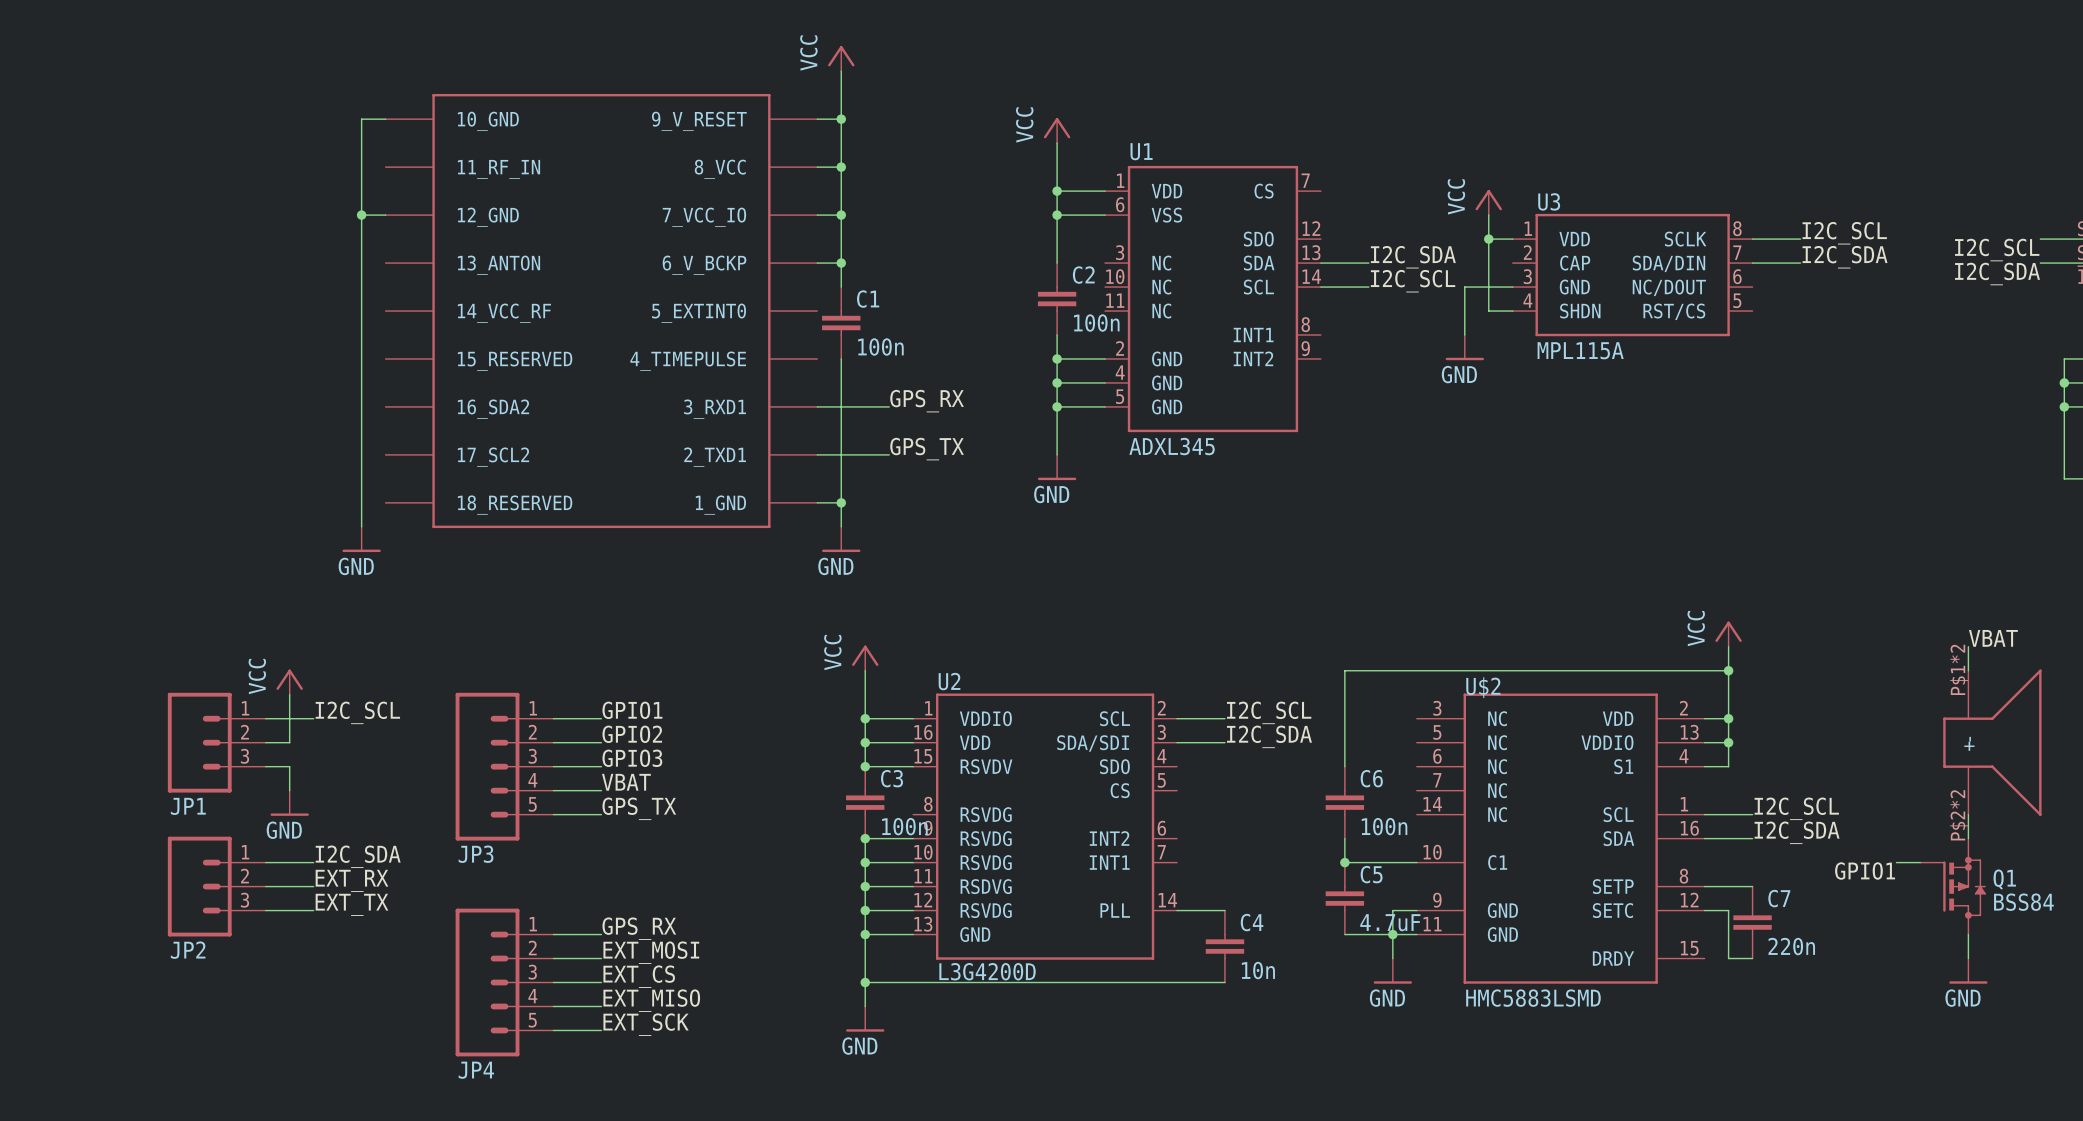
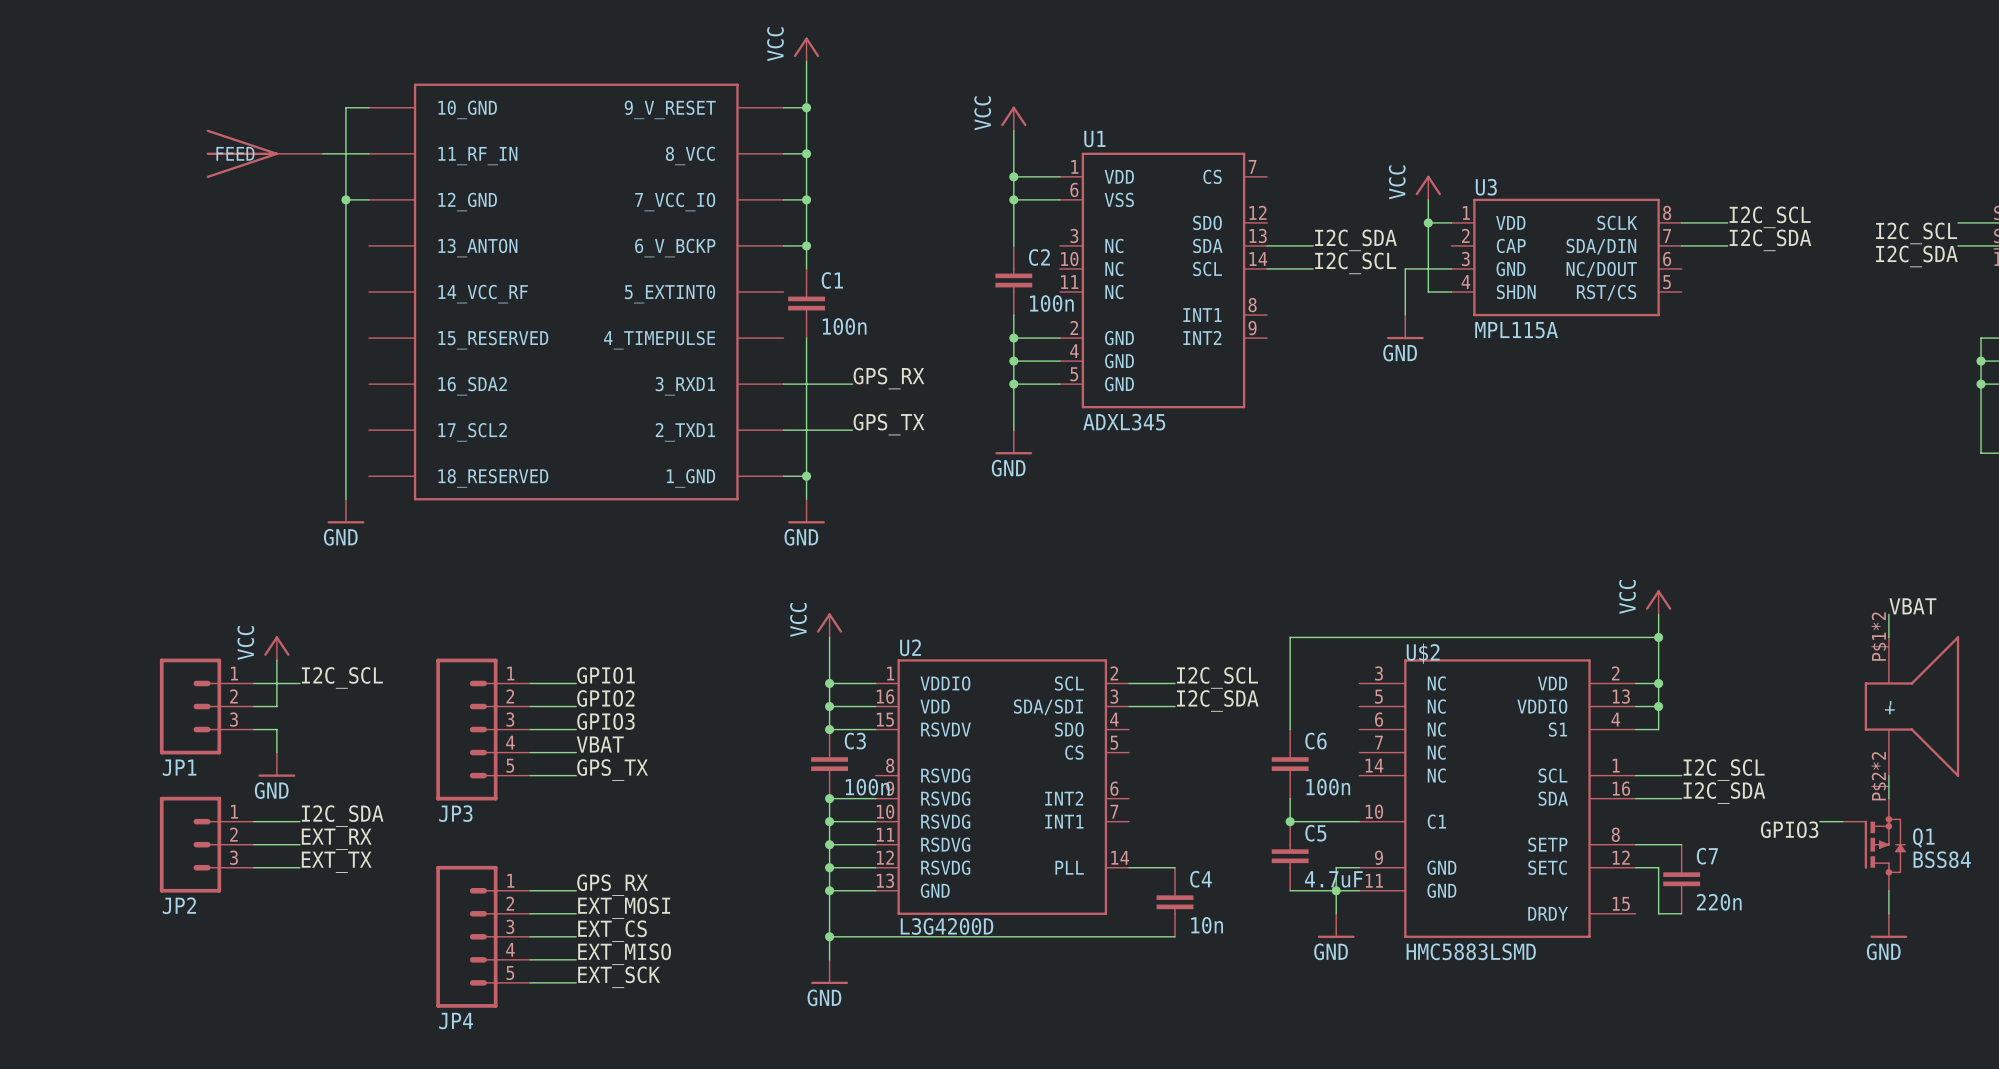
part: none -> (264, 153)
wire: none -> (322, 153) (369, 153)
label: GPIO1 (1865, 871) -> GPIO3 (1789, 829)

